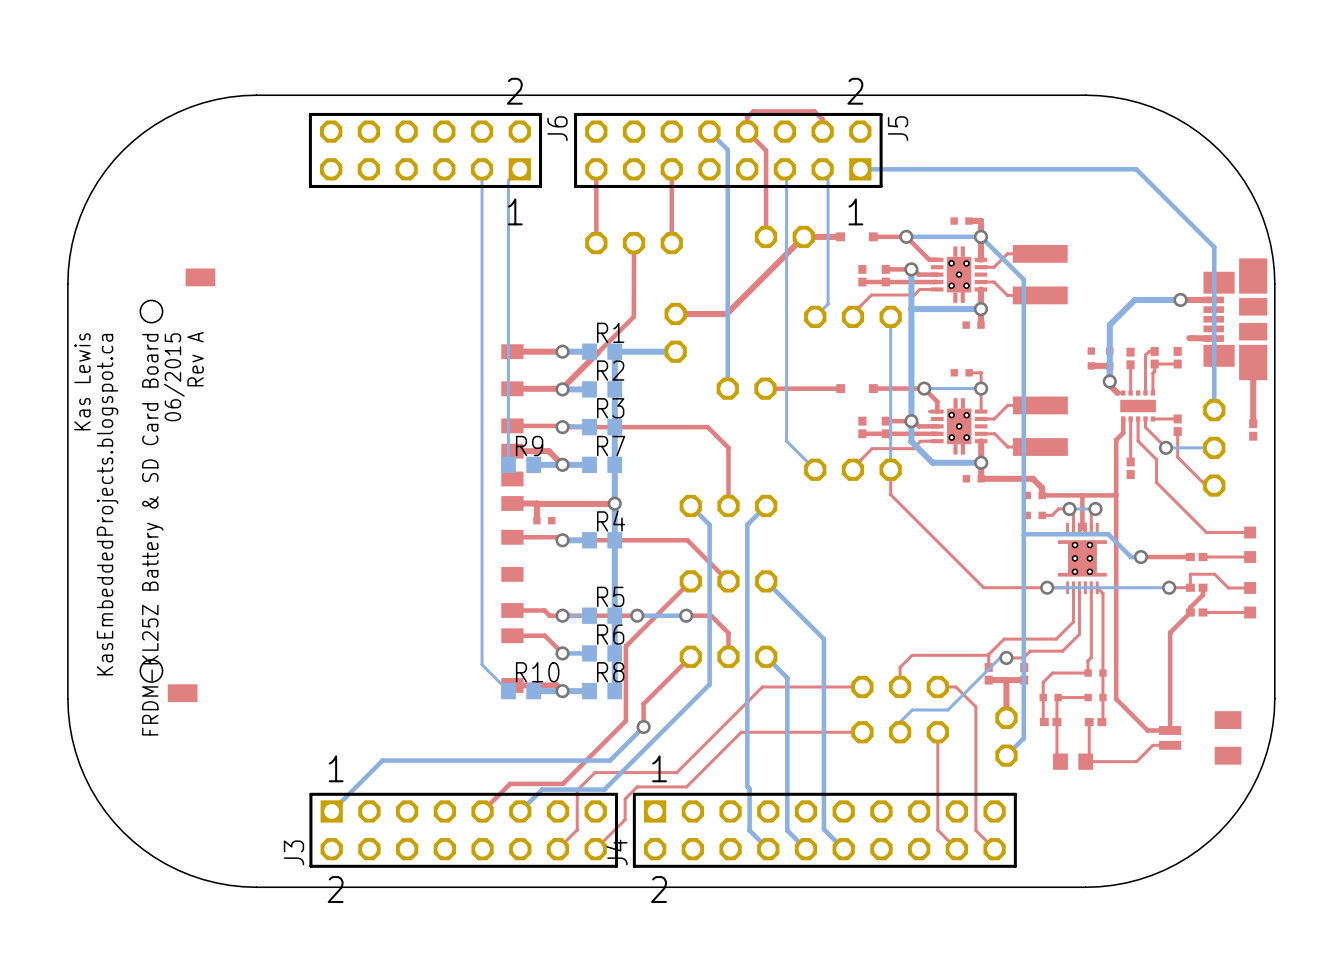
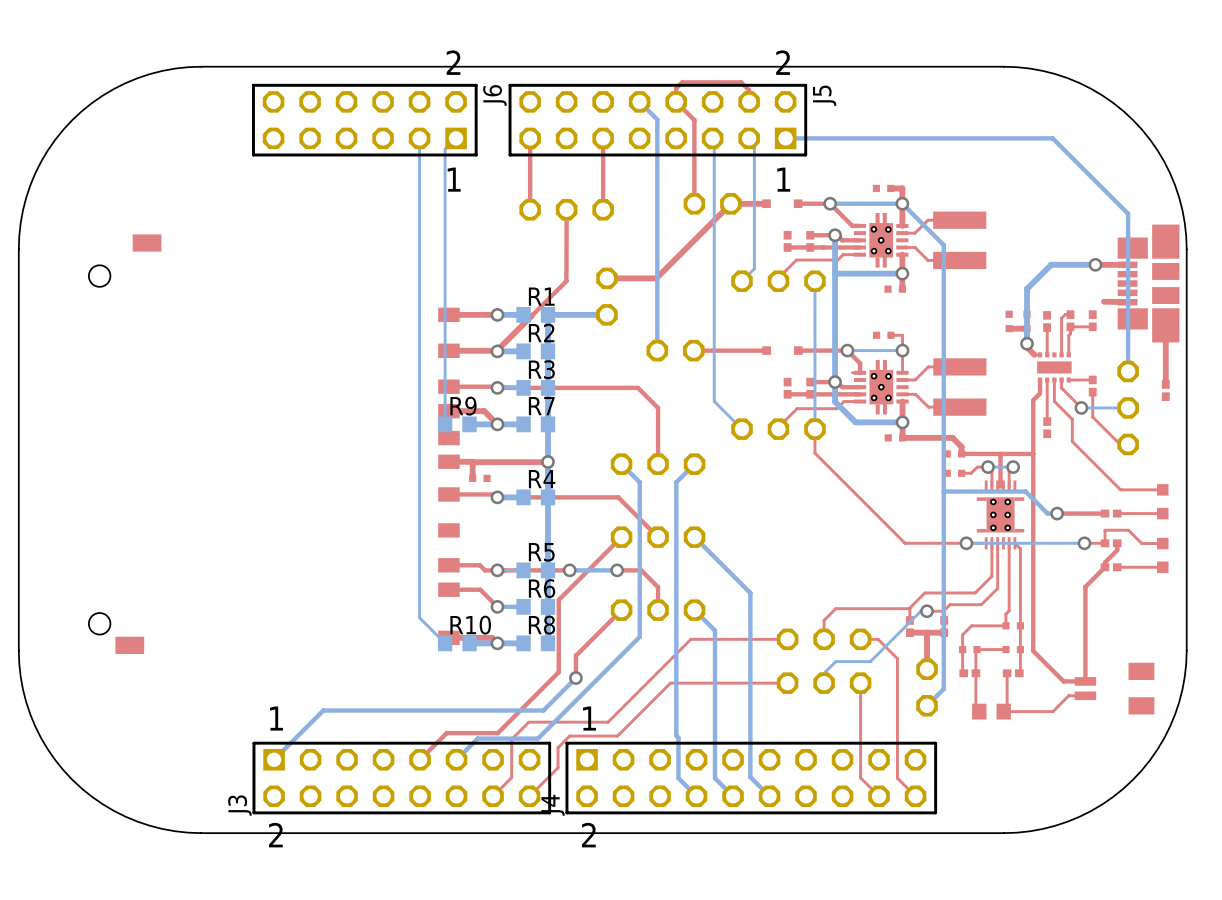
text: Rev A (195, 359) -> none
text: 06/2015 (174, 377) -> none
text: Kas Lewis (82, 381) -> none
text: KasEmbeddedProjects.blogspot.ca (107, 504) -> none
text: FRDM-KL25Z Battery & SD Card Board (152, 534) -> none

